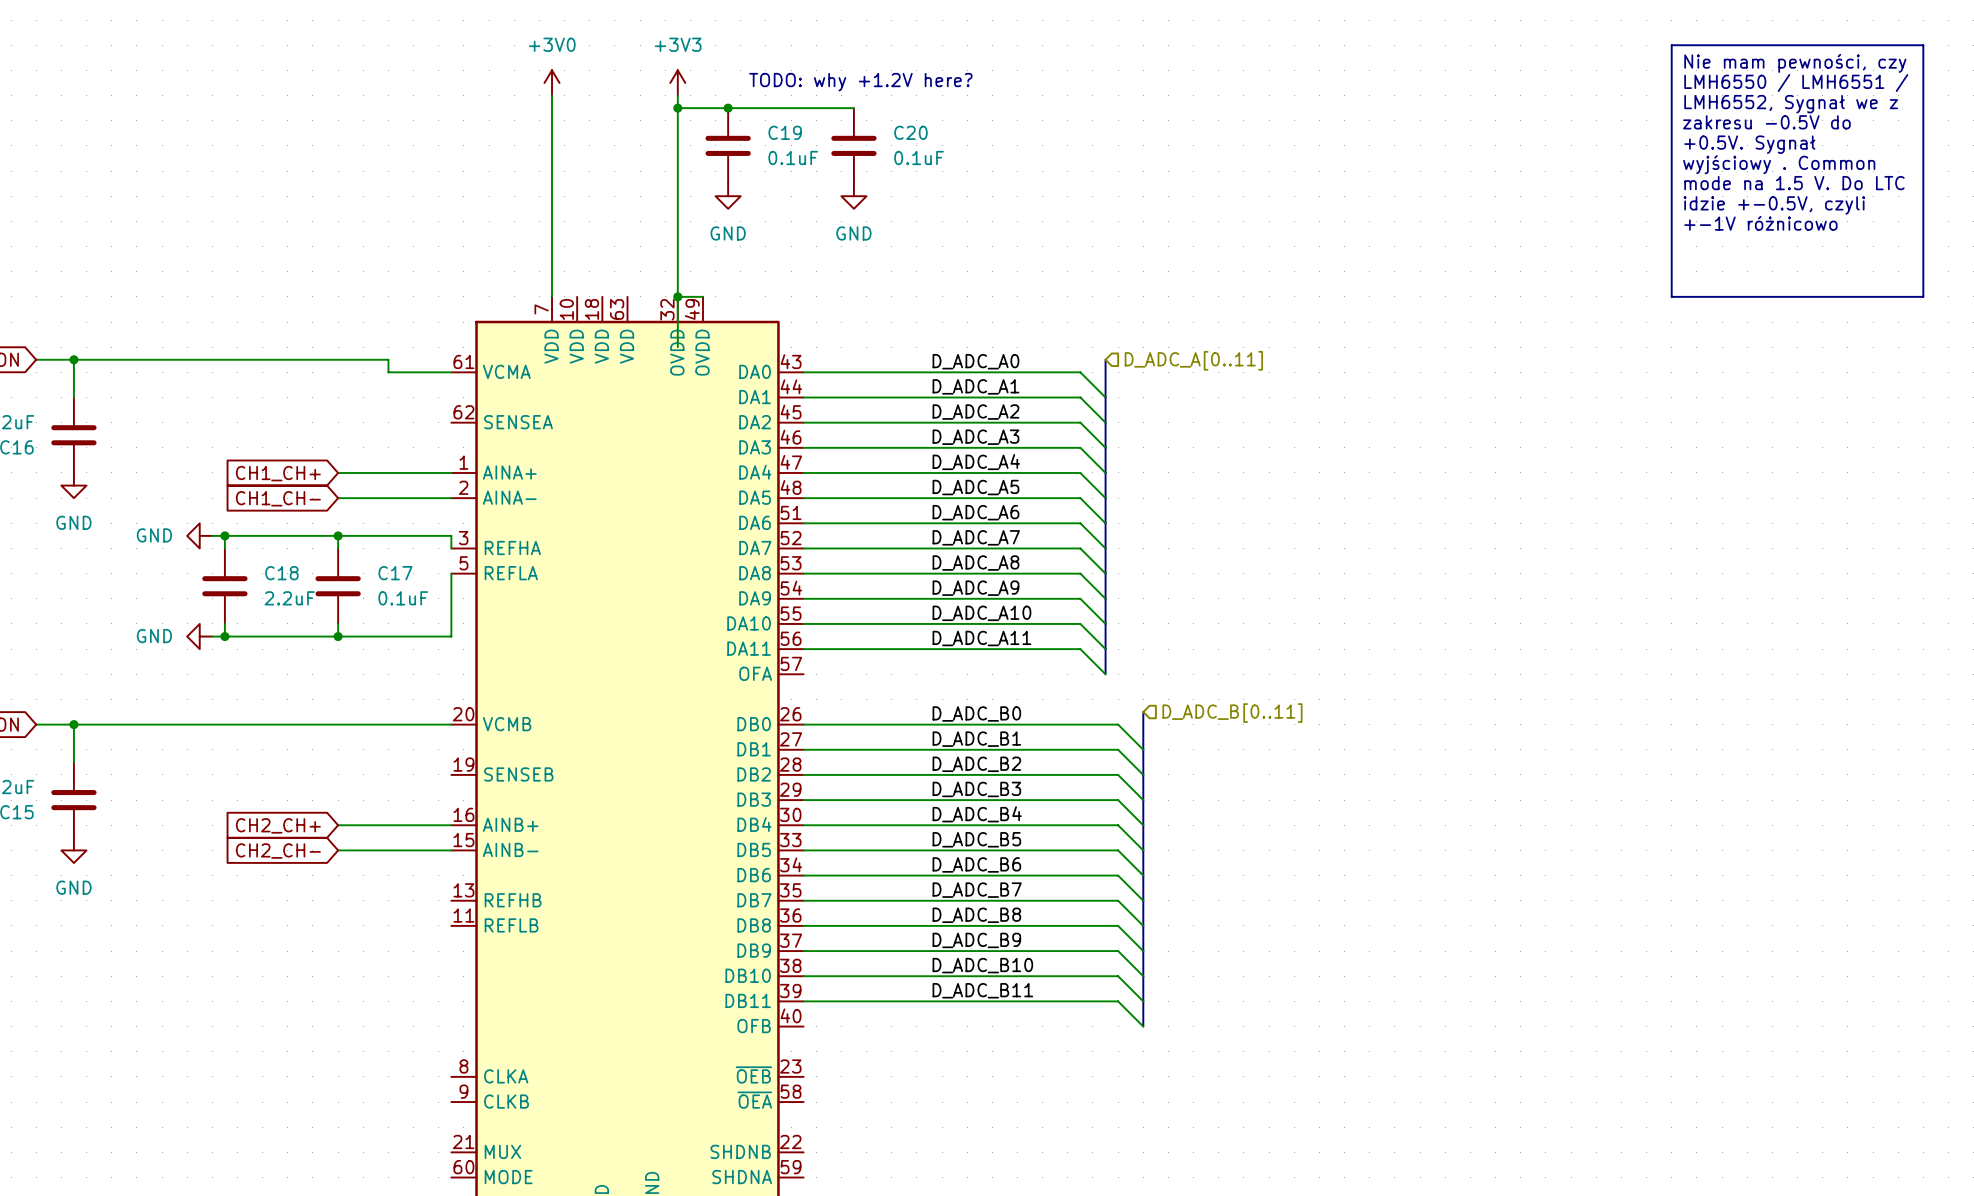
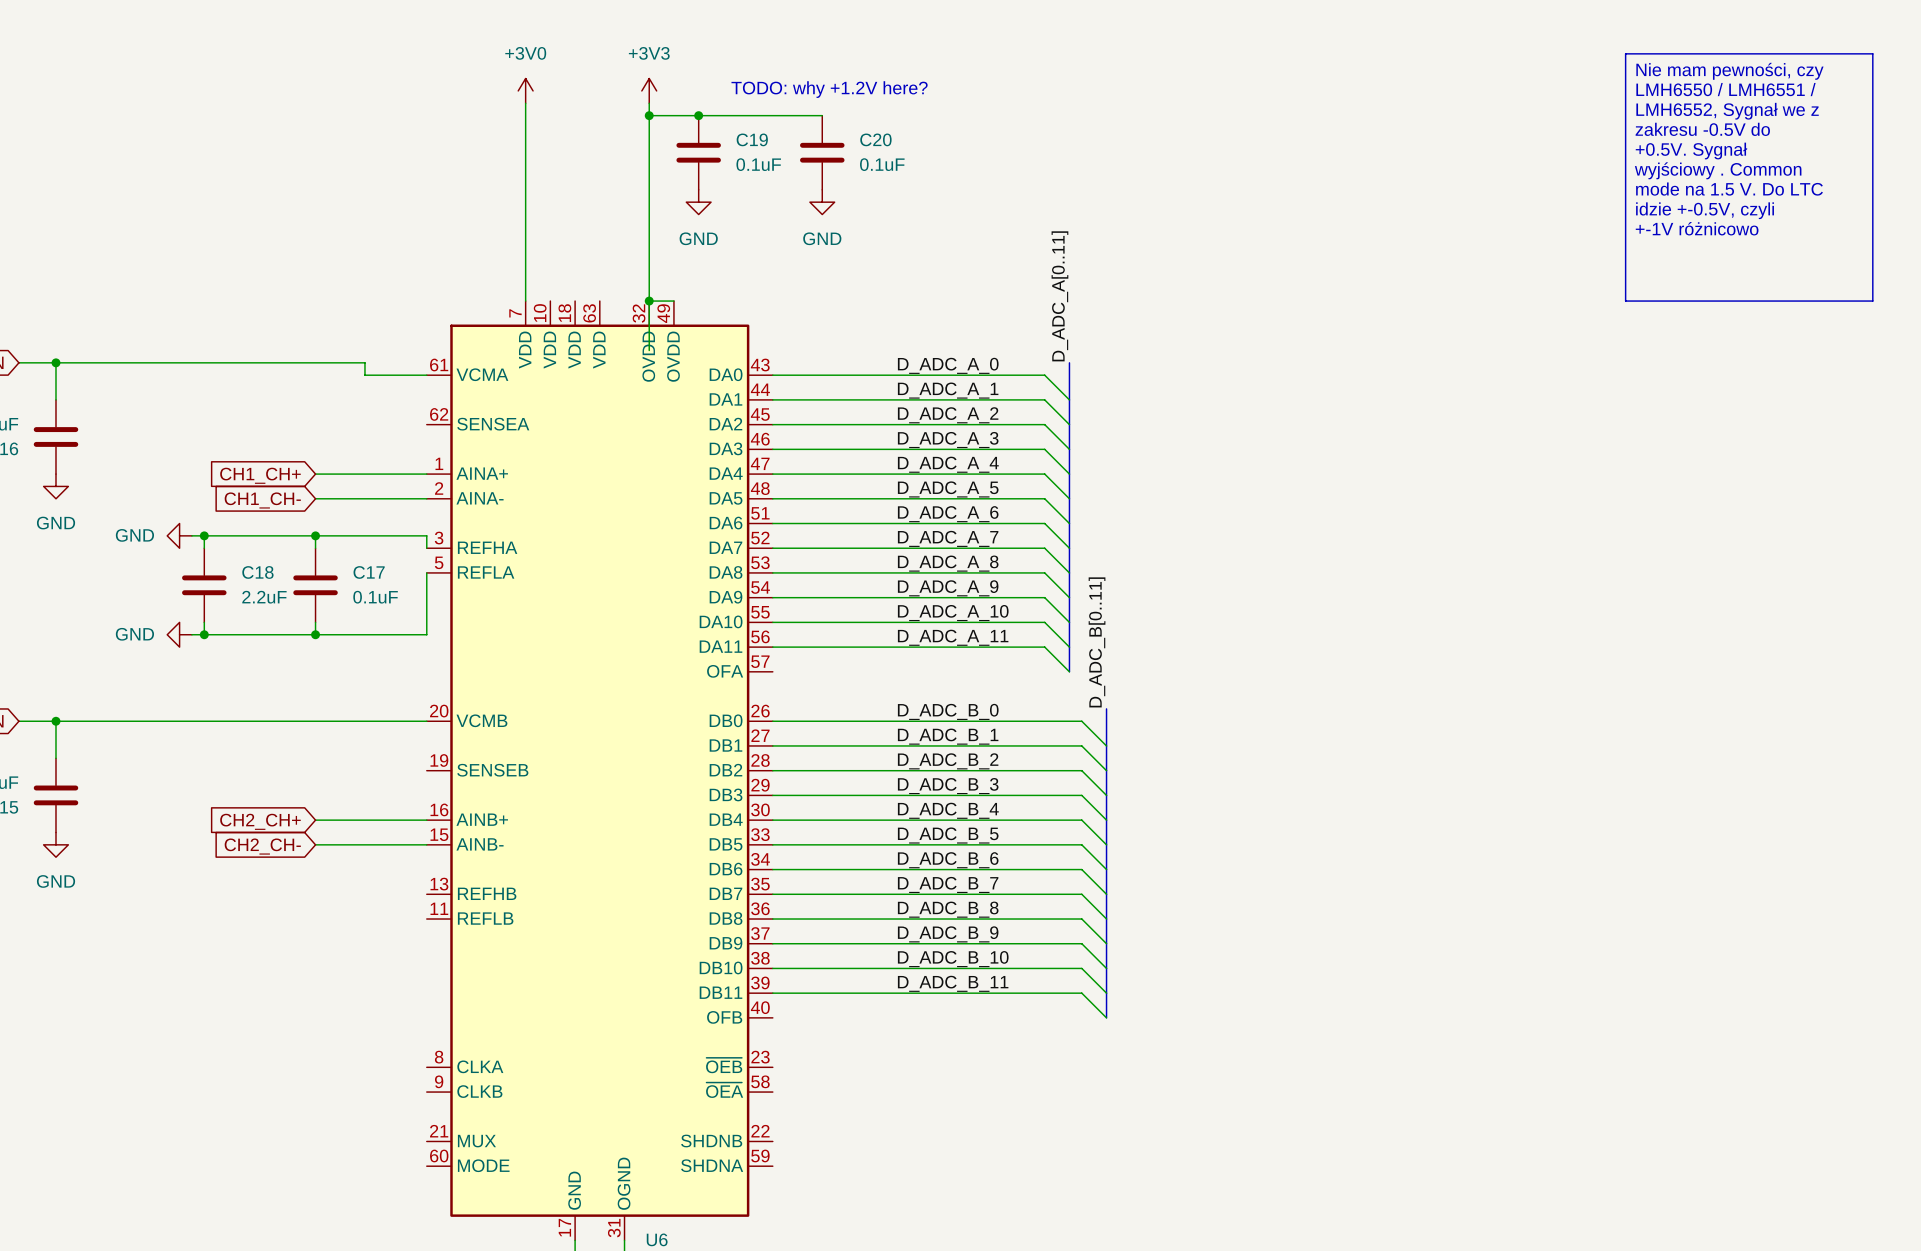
label: none -> D_ADC_A[0..11] (1059, 296)
hierarchical label: D_ADC_A[0..11] (1193, 360) -> none
label: D_ADC_A0 (975, 361) -> D_ADC_A_0 (948, 365)
label: D_ADC_A1 (975, 386) -> D_ADC_A_1 (948, 390)
label: D_ADC_A2 (975, 412) -> D_ADC_A_2 (948, 415)
label: D_ADC_A3 (975, 437) -> D_ADC_A_3 (948, 440)
label: D_ADC_A4 (976, 462) -> D_ADC_A_4 (948, 464)
label: D_ADC_A5 (975, 487) -> D_ADC_A_5 (948, 489)
label: D_ADC_A6 (975, 512) -> D_ADC_A_6 (948, 514)
label: D_ADC_A7 (976, 537) -> D_ADC_A_7 (948, 538)
label: D_ADC_A8 (975, 563) -> D_ADC_A_8 (948, 563)
label: D_ADC_A9 (975, 588) -> D_ADC_A_9 (948, 588)
label: D_ADC_A10 (981, 613) -> D_ADC_A_10 (953, 613)
label: D_ADC_A11 (981, 638) -> D_ADC_A_11 (953, 637)
label: none -> D_ADC_B[0..11] (1097, 642)
label: D_ADC_B0 (976, 713) -> D_ADC_B_0 (948, 711)
hierarchical label: D_ADC_B[0..11] (1232, 713) -> none
label: D_ADC_B1 (976, 739) -> D_ADC_B_1 (948, 736)
label: D_ADC_B2 (976, 764) -> D_ADC_B_2 (948, 761)
label: D_ADC_B3 (976, 789) -> D_ADC_B_3 (948, 786)
label: D_ADC_B4 (977, 814) -> D_ADC_B_4 (948, 810)
label: D_ADC_B5 (976, 839) -> D_ADC_B_5 (948, 835)
label: D_ADC_B6 (976, 864) -> D_ADC_B_6 (948, 860)
label: D_ADC_B7 (977, 890) -> D_ADC_B_7 (948, 884)
label: D_ADC_B8 (976, 915) -> D_ADC_B_8 (948, 909)
label: D_ADC_B9 (976, 940) -> D_ADC_B_9 (948, 934)
label: D_ADC_B10 (982, 965) -> D_ADC_B_10 (953, 959)
label: D_ADC_B11 (982, 990) -> D_ADC_B_11 (953, 983)

